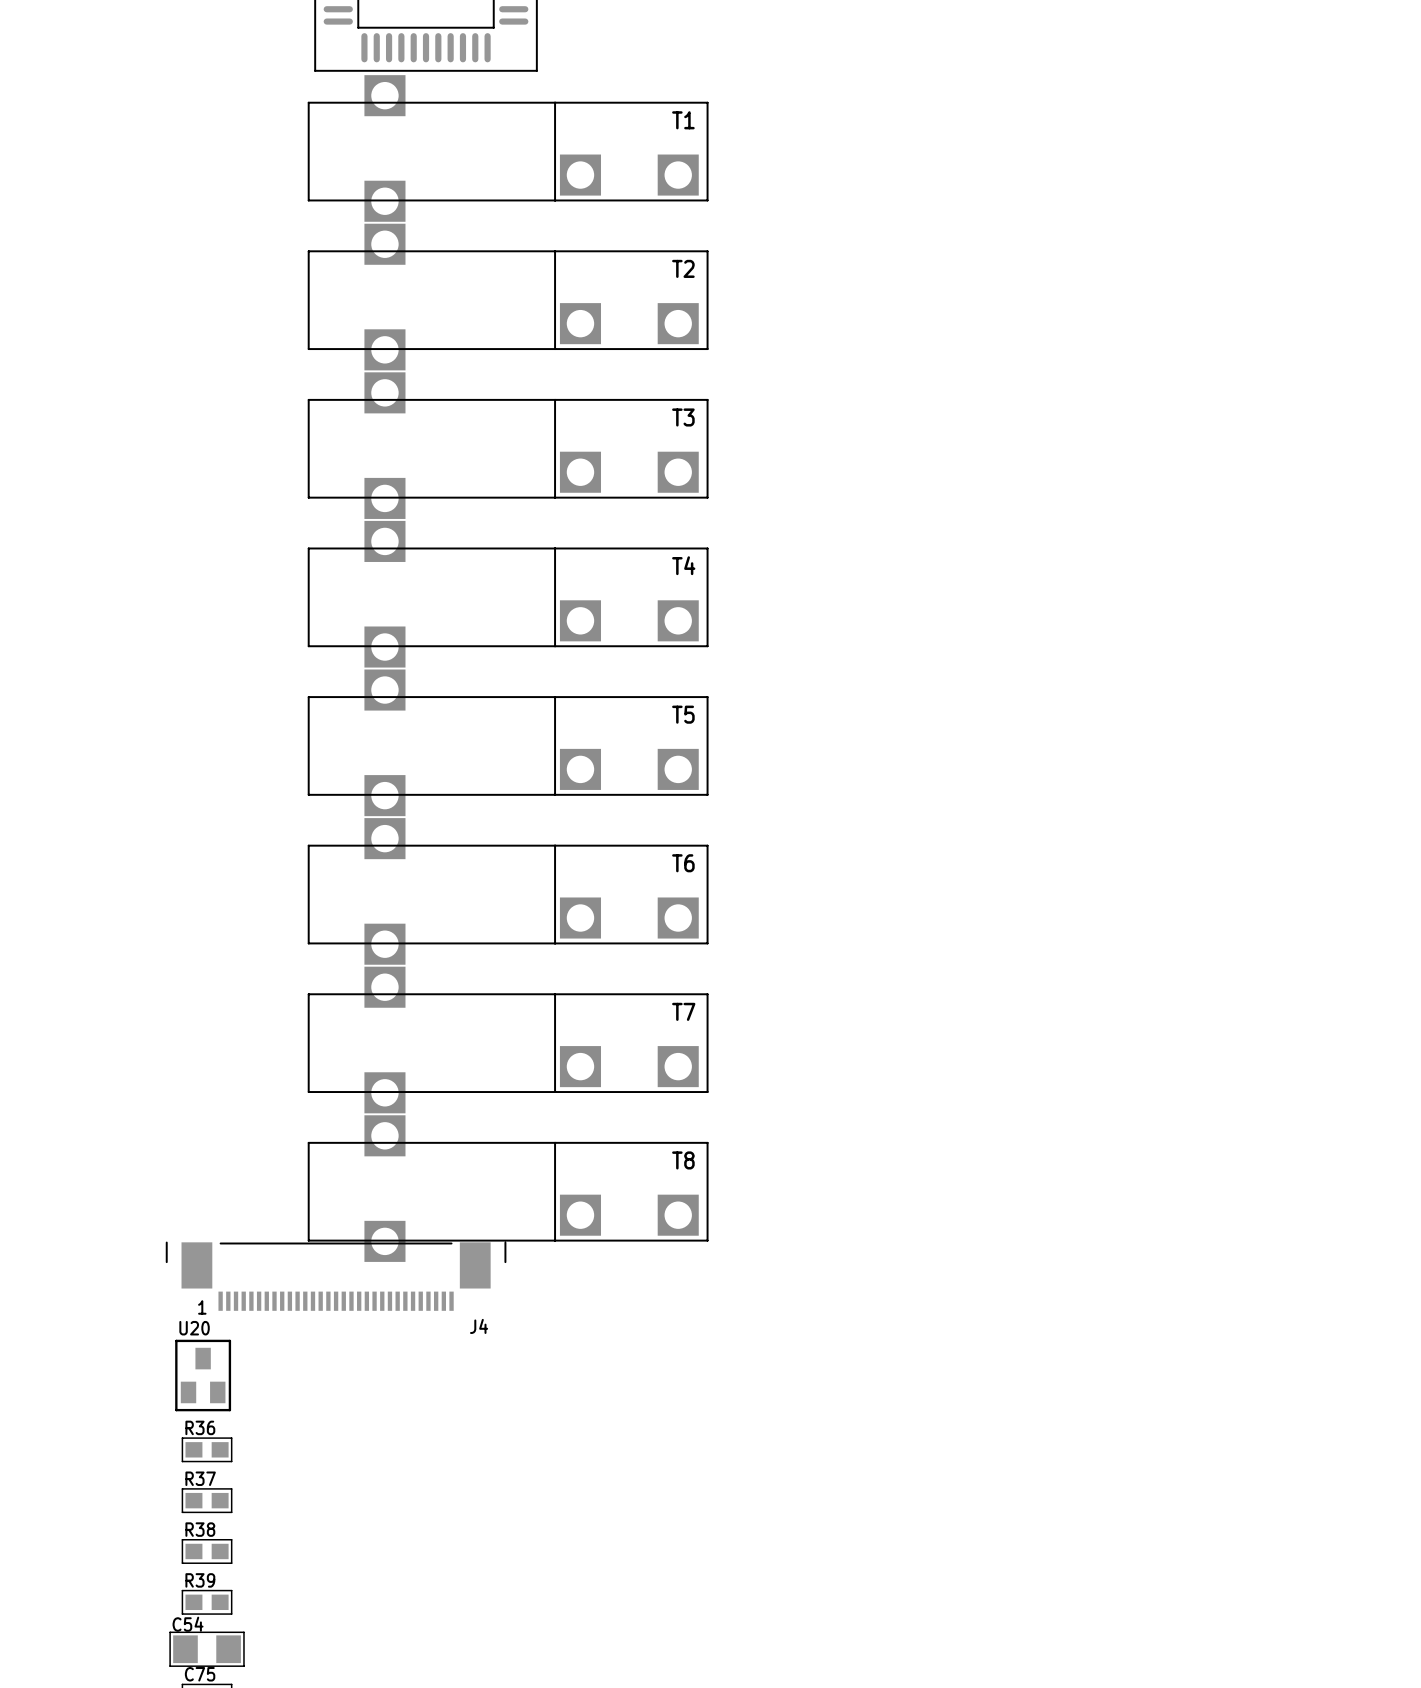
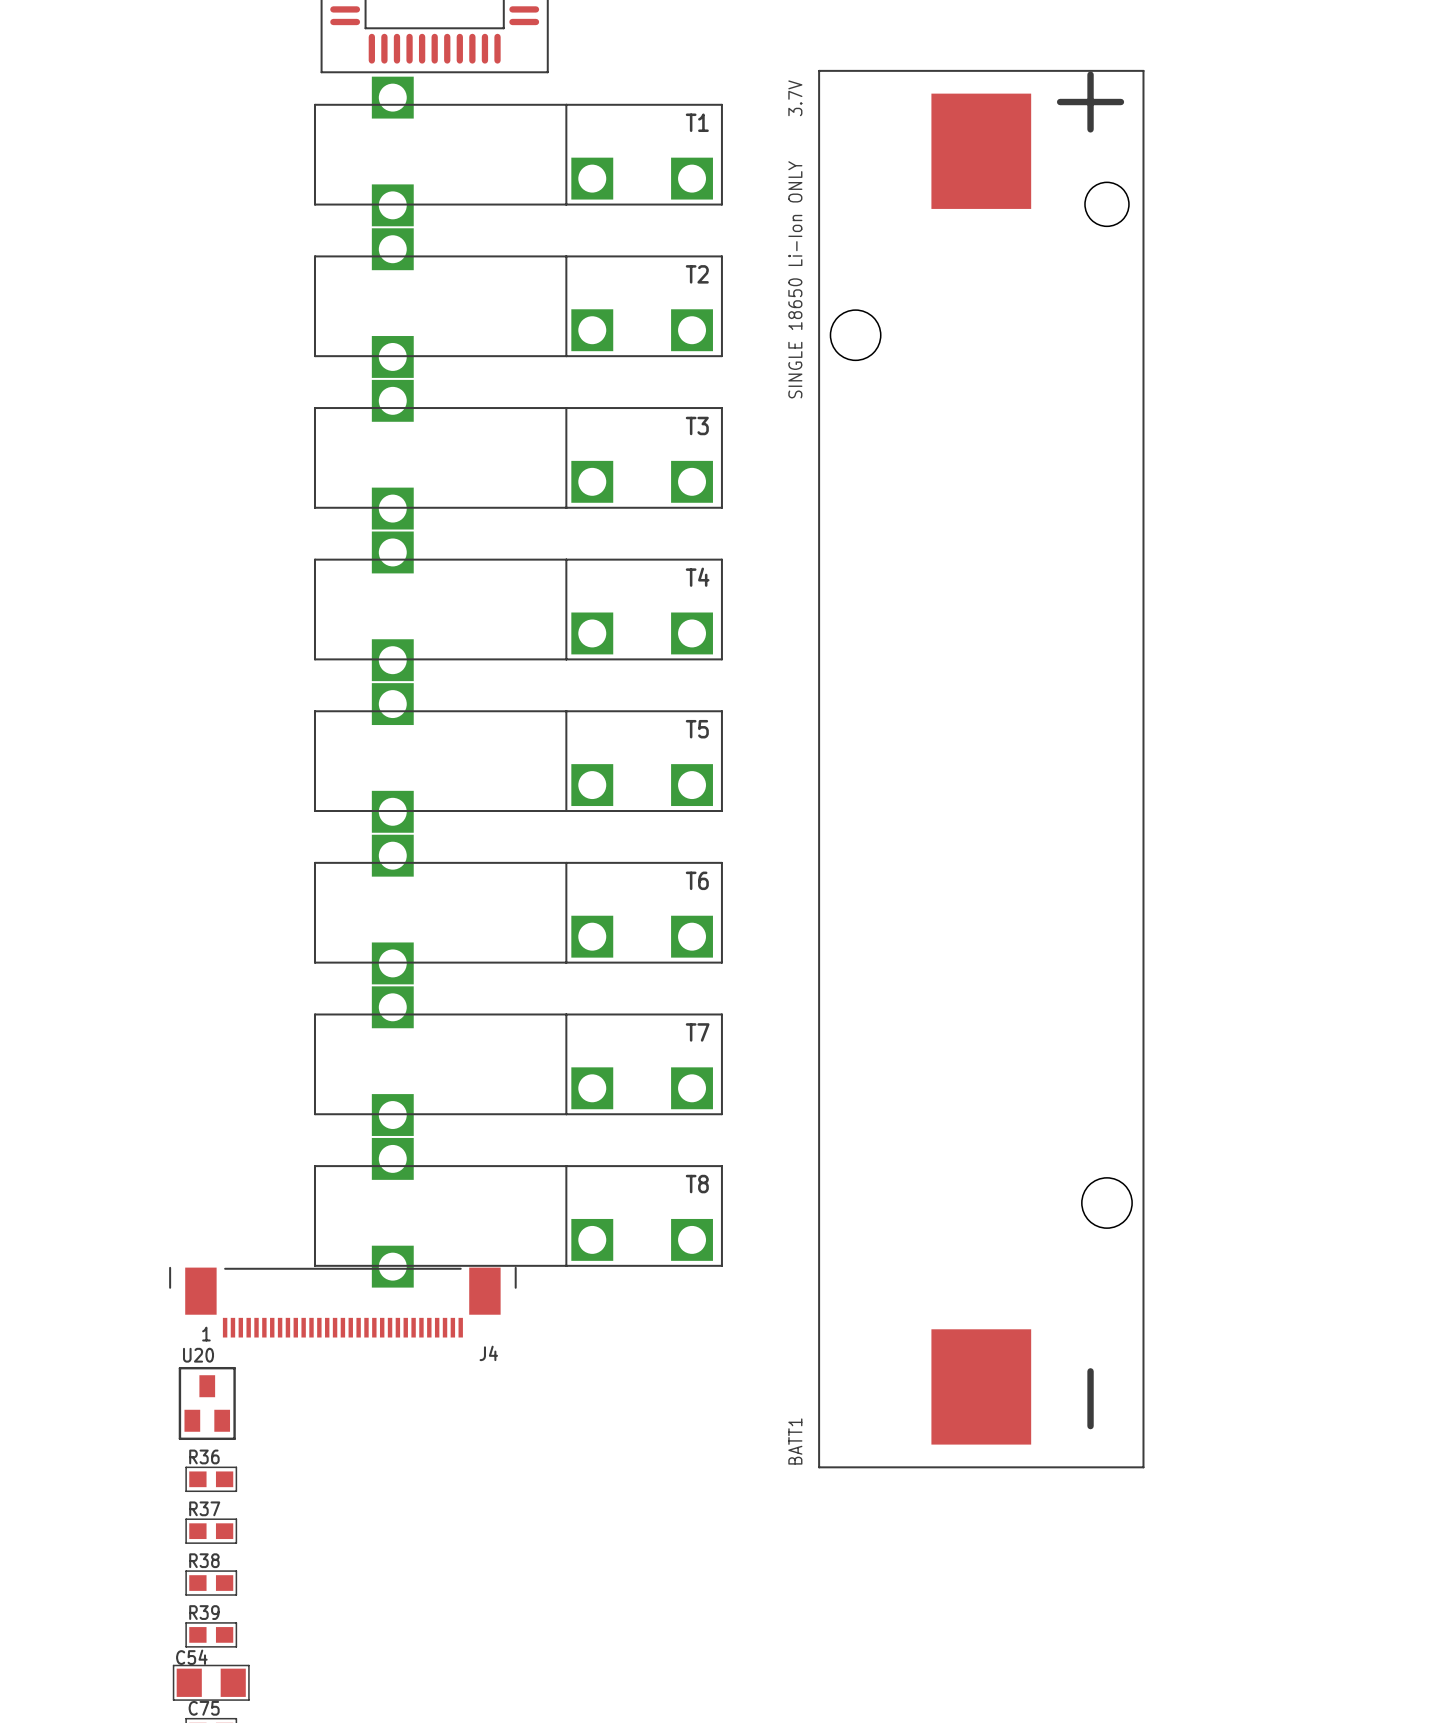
BATT1: none -> (981, 769)

